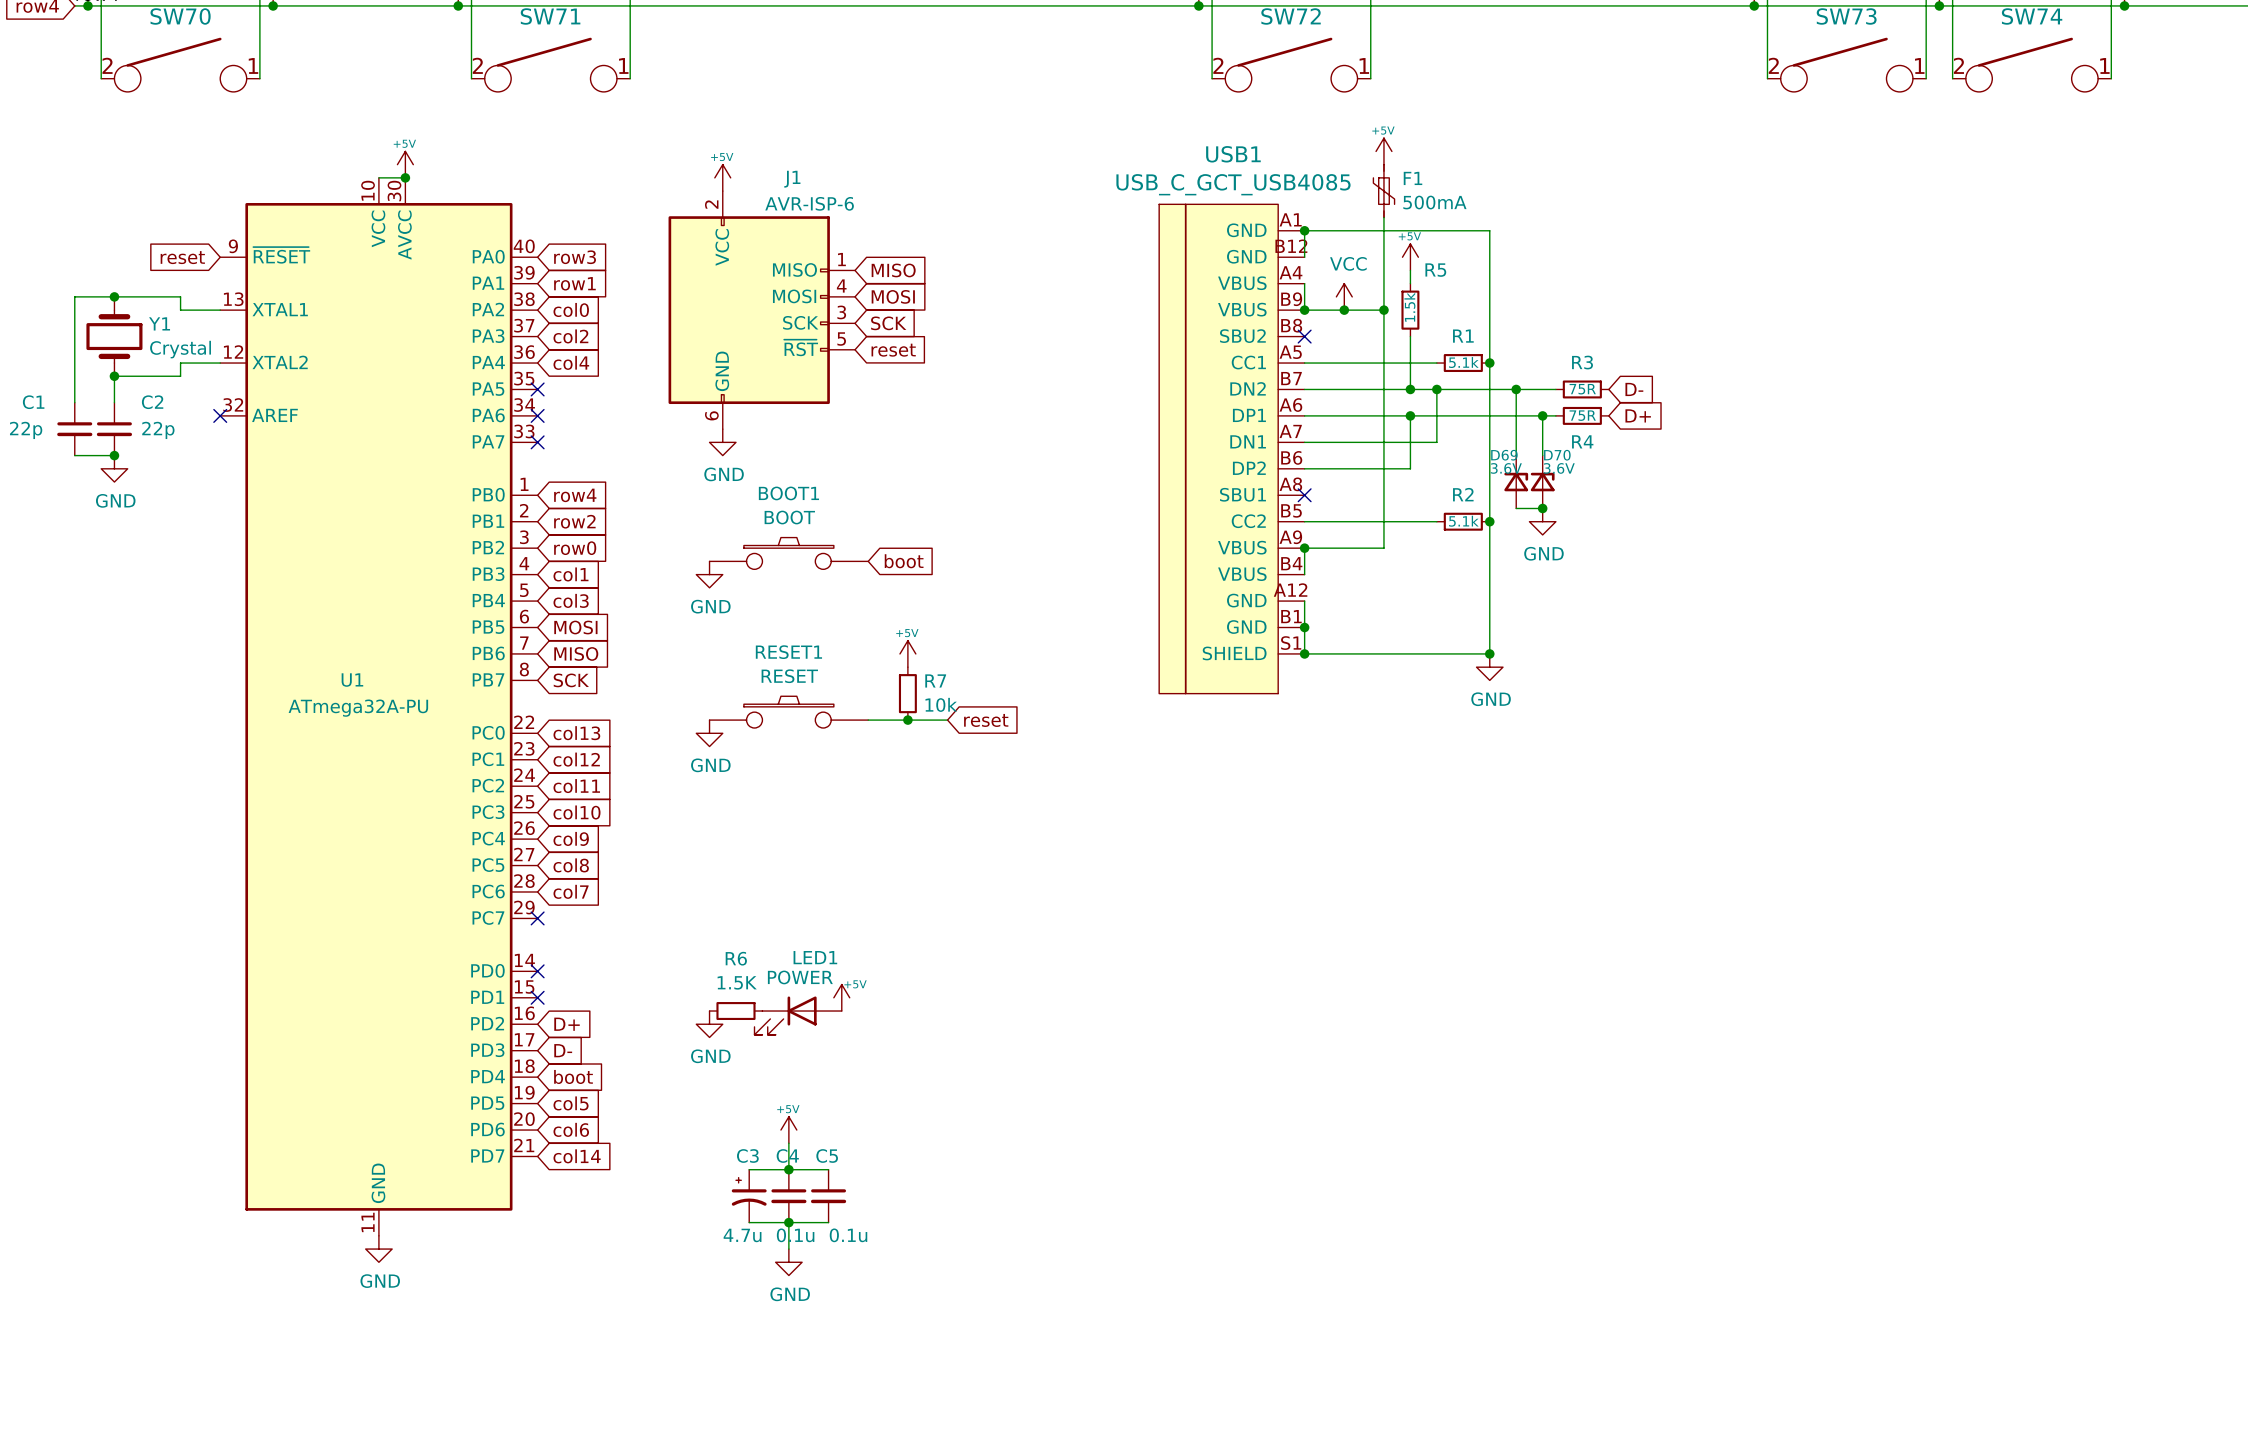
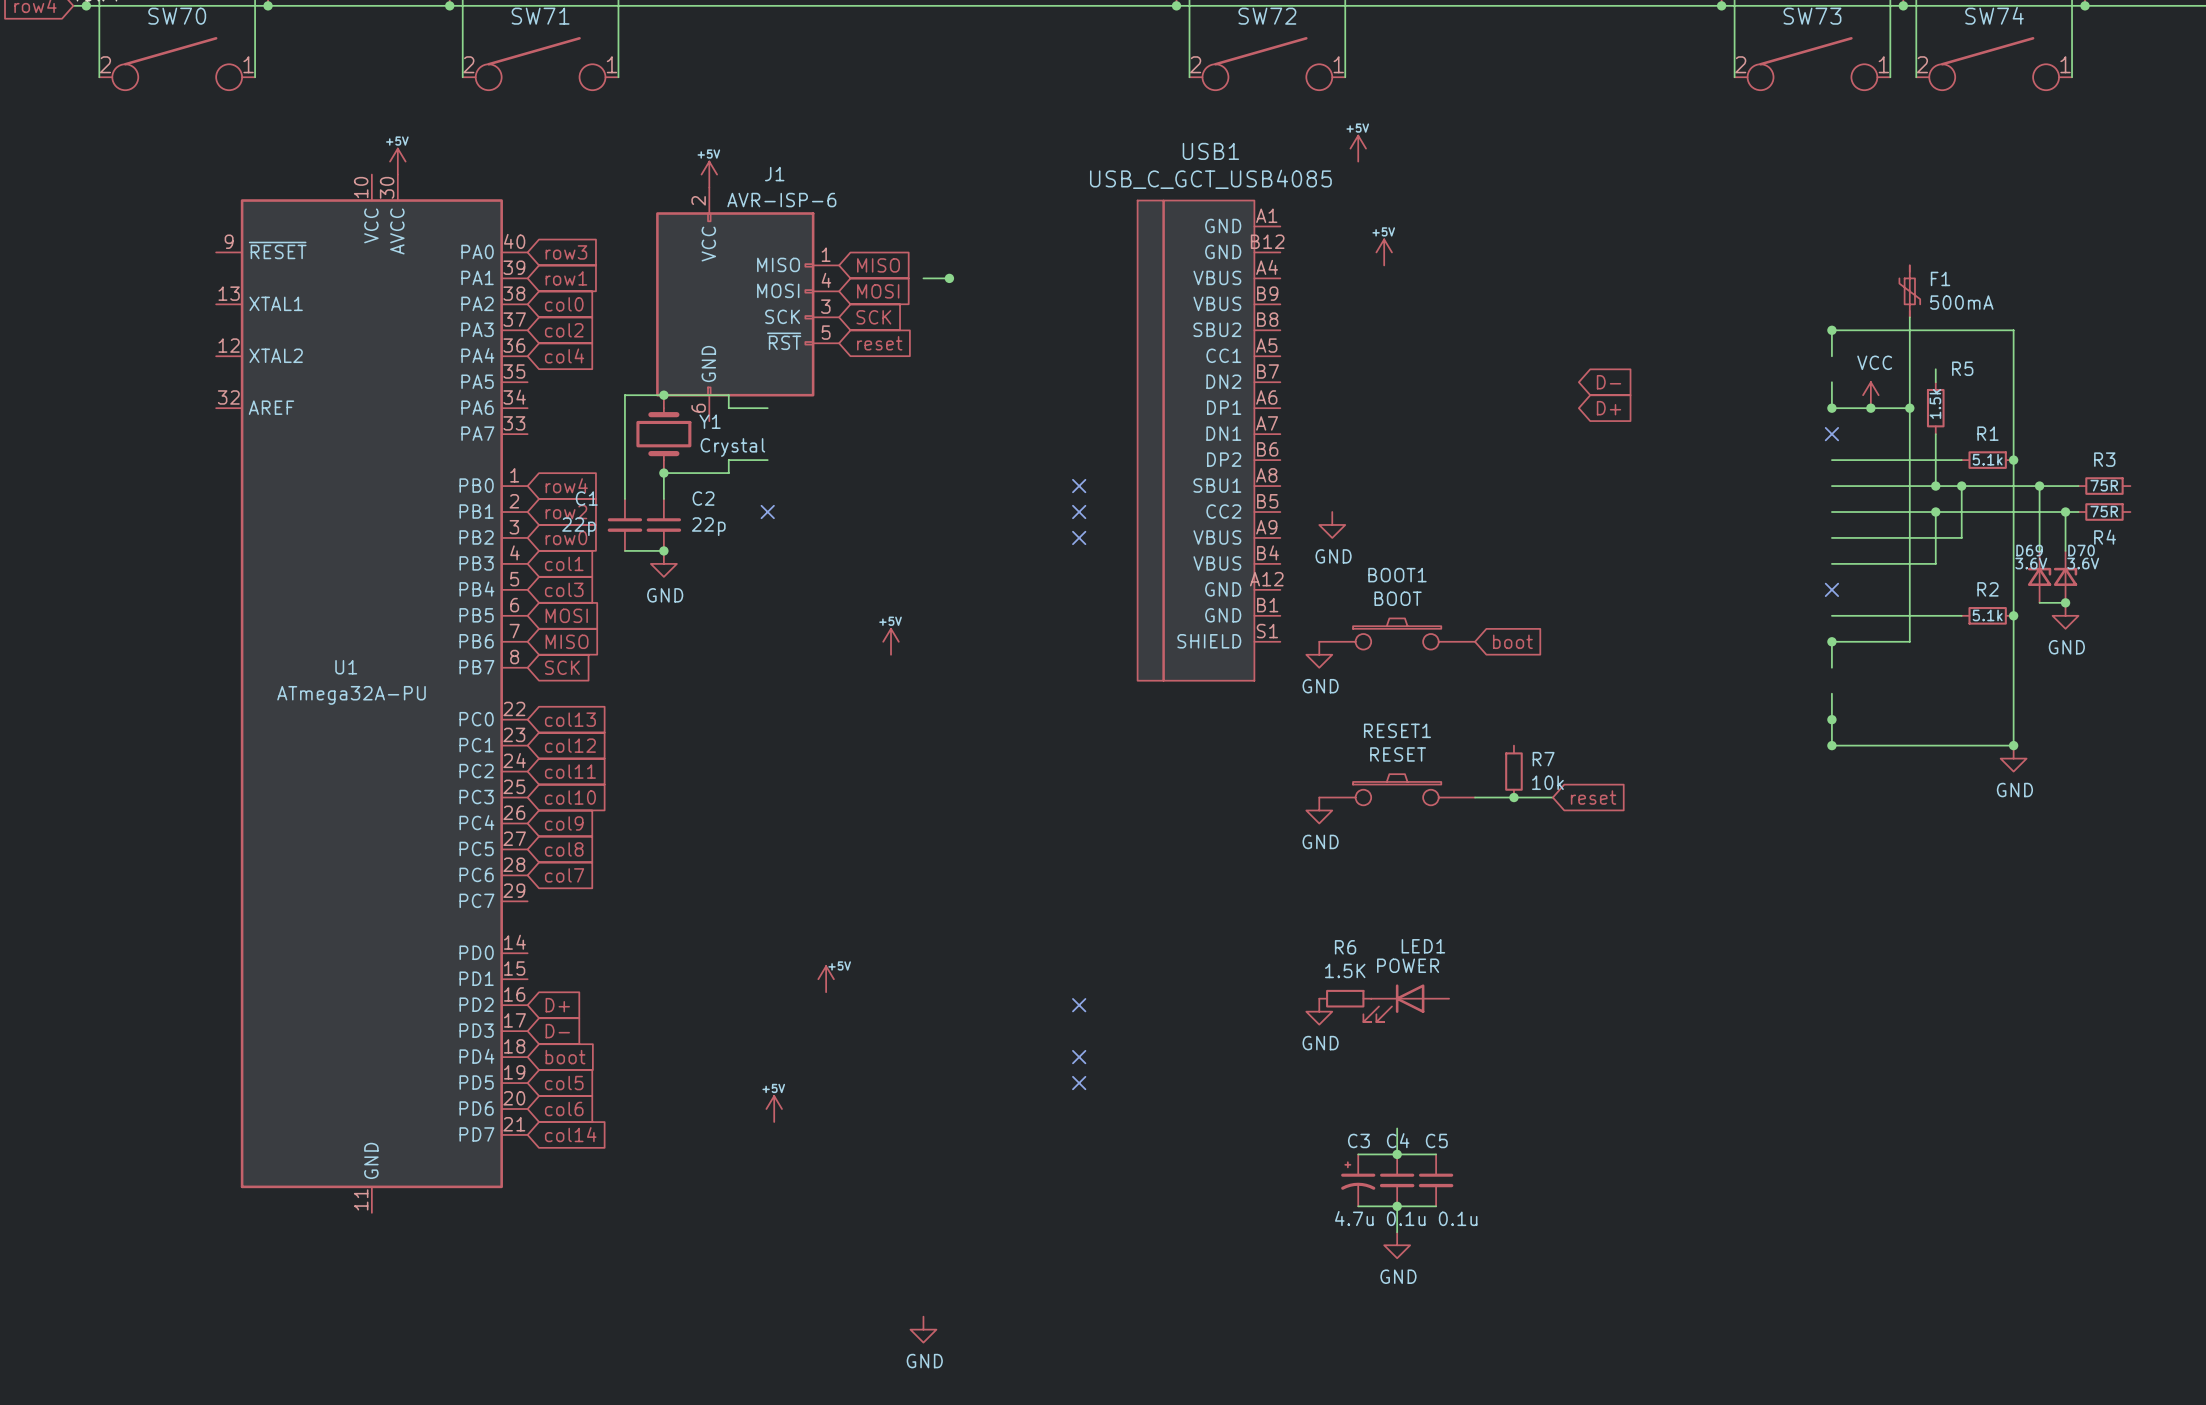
wire: (378, 177) (405, 177) -> none
junction: (405, 177) -> none
F1 position: (1383, 191) -> (1909, 291)
wire: (1383, 217) (1383, 548) (1304, 548) (1304, 574) -> none
junction: (1304, 230) -> none
global label: reset (182, 257) -> none
wire: (1304, 257) (1304, 230) (1489, 230) (1489, 653) (1304, 653) (1304, 601) -> none
wire: (1410, 270) (1410, 283) -> none
wire: none -> (923, 278) (949, 278)
junction: none -> (949, 278)
wire: (1304, 283) (1304, 310) (1383, 310) -> none
junction: (114, 296) -> none
power symbol: VCC (1344, 296) -> none
wire: (220, 310) (180, 310) (180, 296) (74, 296) (74, 402) -> none
junction: (1304, 310) -> none
junction: (1344, 310) -> none
junction: (1383, 310) -> none
R5 position: (1410, 310) -> (1935, 408)
wire: none -> (1909, 317) (1909, 641) (1831, 641) (1831, 667)
Y1 position: (114, 336) -> (663, 434)
no-connect mark: (1304, 336) -> none
wire: (1410, 336) (1410, 389) -> none
junction: none -> (1831, 330)
wire: (220, 363) (180, 363) (180, 376) (114, 376) (114, 402) -> none
wire: (1304, 363) (1436, 363) -> none
R1 position: (1463, 363) -> (1987, 460)
junction: (1489, 363) -> none
wire: none -> (1831, 356) (1831, 330) (2013, 330) (2013, 745) (1831, 745) (1831, 693)
junction: (114, 376) -> none
wire: none -> (1935, 369) (1935, 382)
no-connect mark: (537, 389) -> none
wire: (1304, 389) (1555, 389) -> none
junction: (1410, 389) -> none
wire: (1436, 389) (1436, 442) (1304, 442) -> none
junction: (1436, 389) -> none
wire: (1516, 389) (1516, 455) -> none
junction: (1516, 389) -> none
R3 position: (1582, 389) -> (2104, 486)
wire: none -> (1831, 382) (1831, 408) (1909, 408)
junction: none -> (663, 395)
power symbol: none -> VCC (1870, 395)
no-connect mark: (220, 415) -> none
no-connect mark: (537, 415) -> none
wire: none -> (767, 408) (728, 408) (728, 395) (624, 395) (624, 499)
wire: (1304, 415) (1555, 415) -> none
wire: (1410, 415) (1410, 468) (1304, 468) -> none
junction: (1410, 415) -> none
wire: (1542, 415) (1542, 455) -> none
junction: (1542, 415) -> none
R4 position: (1582, 415) -> (2104, 512)
junction: none -> (1831, 408)
junction: none -> (1870, 408)
junction: none -> (1909, 408)
C1 position: (74, 429) -> (624, 524)
C2 position: (114, 429) -> (663, 524)
no-connect mark: (537, 442) -> none
power symbol: GND (722, 442) -> none
no-connect mark: none -> (1831, 434)
wire: none -> (1935, 434) (1935, 486)
wire: (74, 455) (114, 455) -> none
junction: (114, 455) -> none
power symbol: GND (114, 468) -> none
wire: none -> (767, 460) (728, 460) (728, 473) (663, 473) (663, 499)
wire: none -> (1831, 460) (1961, 460)
junction: none -> (2013, 460)
junction: none -> (663, 473)
D69 position: (1516, 482) -> (2039, 576)
D70 position: (1542, 482) -> (2065, 576)
no-connect mark: none -> (1079, 486)
no-connect mark: (1304, 495) -> none
wire: none -> (1831, 486) (2078, 486)
junction: none -> (1935, 486)
wire: none -> (1961, 486) (1961, 537) (1831, 537)
junction: none -> (1961, 486)
wire: none -> (2039, 486) (2039, 550)
junction: none -> (2039, 486)
wire: (1516, 508) (1542, 508) -> none
junction: (1542, 508) -> none
no-connect mark: none -> (767, 512)
no-connect mark: none -> (1079, 512)
wire: (1304, 521) (1436, 521) -> none
R2 position: (1463, 521) -> (1987, 615)
junction: (1489, 521) -> none
power symbol: GND (1542, 521) -> none
wire: none -> (1831, 512) (2078, 512)
wire: none -> (1935, 512) (1935, 563) (1831, 563)
junction: none -> (1935, 512)
wire: none -> (2065, 512) (2065, 550)
junction: none -> (2065, 512)
power symbol: none -> GND (1332, 524)
no-connect mark: none -> (1079, 537)
junction: (1304, 548) -> none
BOOT1 position: (788, 553) -> (1397, 634)
wire: none -> (624, 550) (663, 550)
junction: none -> (663, 550)
global label: boot (904, 561) -> none
power symbol position: GND (709, 574) -> GND (663, 563)
no-connect mark: none -> (1831, 589)
wire: none -> (2039, 602) (2065, 602)
junction: none -> (2065, 602)
junction: (1304, 627) -> none
wire: none -> (1831, 615) (1961, 615)
junction: none -> (2013, 615)
power symbol: none -> GND (2065, 615)
junction: (1304, 653) -> none
junction: (1489, 653) -> none
global label: none -> boot (1512, 641)
junction: none -> (1831, 641)
power symbol: none -> GND (1319, 654)
power symbol: GND (1489, 667) -> none
R7 position: (907, 693) -> (1513, 771)
RESET1 position: (788, 712) -> (1397, 789)
wire: (868, 720) (947, 720) -> none
junction: (907, 720) -> none
global label: reset (986, 720) -> none
power symbol: GND (709, 733) -> none
junction: none -> (1831, 719)
junction: none -> (1831, 745)
junction: none -> (2013, 745)
power symbol: none -> GND (2013, 758)
wire: none -> (1475, 797) (1552, 797)
junction: none -> (1513, 797)
global label: none -> reset (1593, 797)
power symbol: none -> GND (1319, 810)
no-connect mark: (537, 918) -> none
no-connect mark: (537, 971) -> none
no-connect mark: (537, 997) -> none
R6 position: (735, 1011) -> (1345, 998)
LED1 position: (798, 1015) -> (1406, 1003)
power symbol: GND (709, 1024) -> none
no-connect mark: none -> (1079, 1005)
power symbol: none -> GND (1319, 1011)
no-connect mark: none -> (1079, 1057)
no-connect mark: none -> (1079, 1083)
wire: (788, 1143) (788, 1169) -> none
wire: none -> (1397, 1128) (1397, 1154)
wire: (749, 1169) (828, 1169) -> none
junction: (788, 1169) -> none
wire: none -> (1358, 1154) (1436, 1154)
junction: none -> (1397, 1154)
C3 position: (749, 1196) -> (1358, 1180)
C4 position: (788, 1196) -> (1397, 1180)
C5 position: (828, 1196) -> (1436, 1180)
wire: (749, 1222) (828, 1222) -> none
wire: (788, 1222) (788, 1249) -> none
junction: (788, 1222) -> none
wire: none -> (1358, 1206) (1436, 1206)
wire: none -> (1397, 1206) (1397, 1232)
junction: none -> (1397, 1206)
power symbol: GND (378, 1249) -> none
power symbol position: GND (788, 1262) -> GND (923, 1329)
power symbol: none -> GND (1397, 1245)

